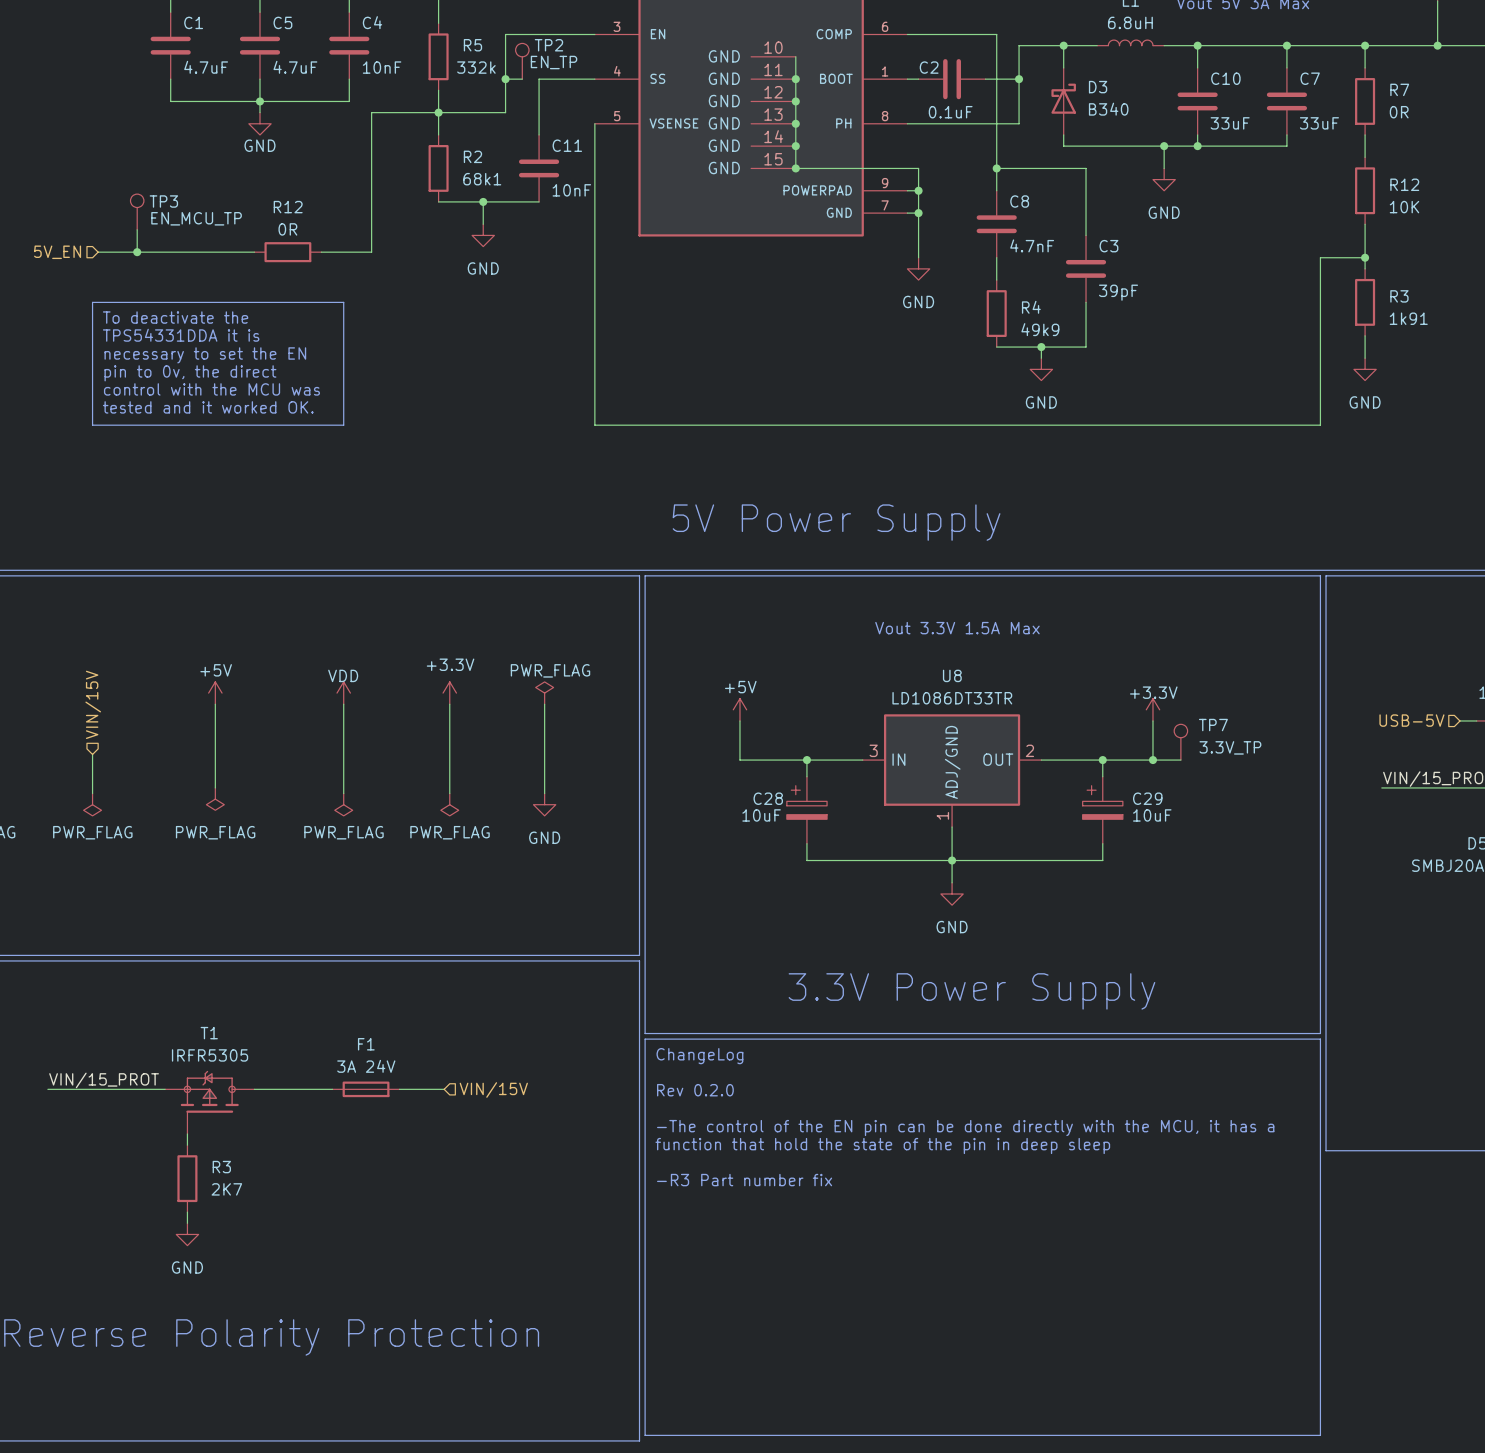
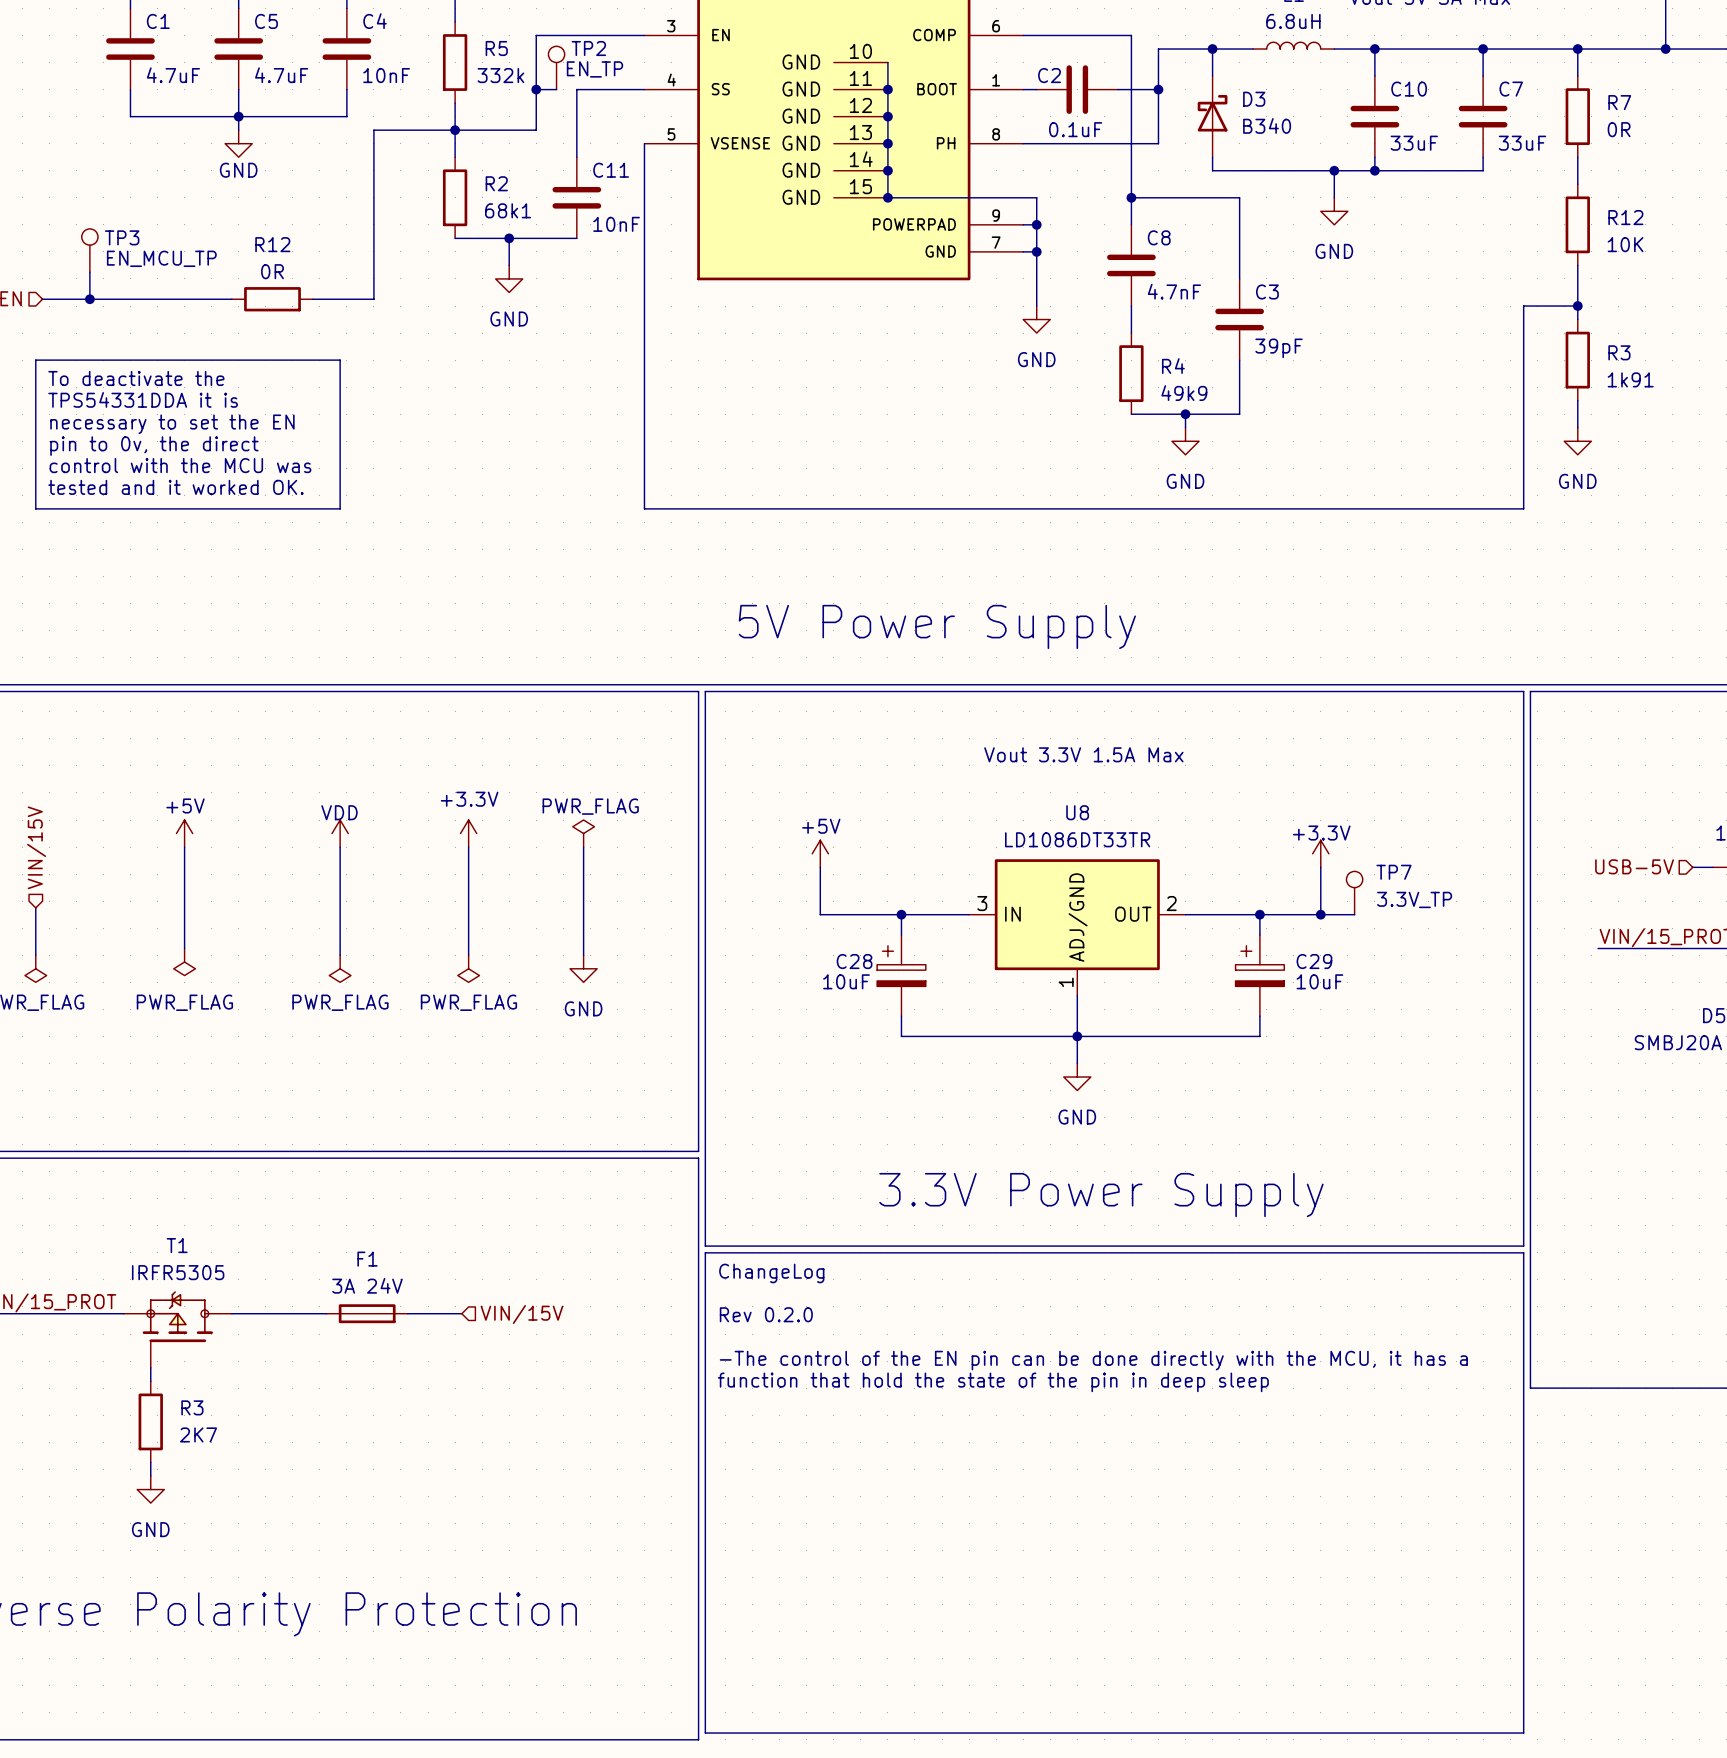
text: -R3 Part number fix (744, 1180) -> none

